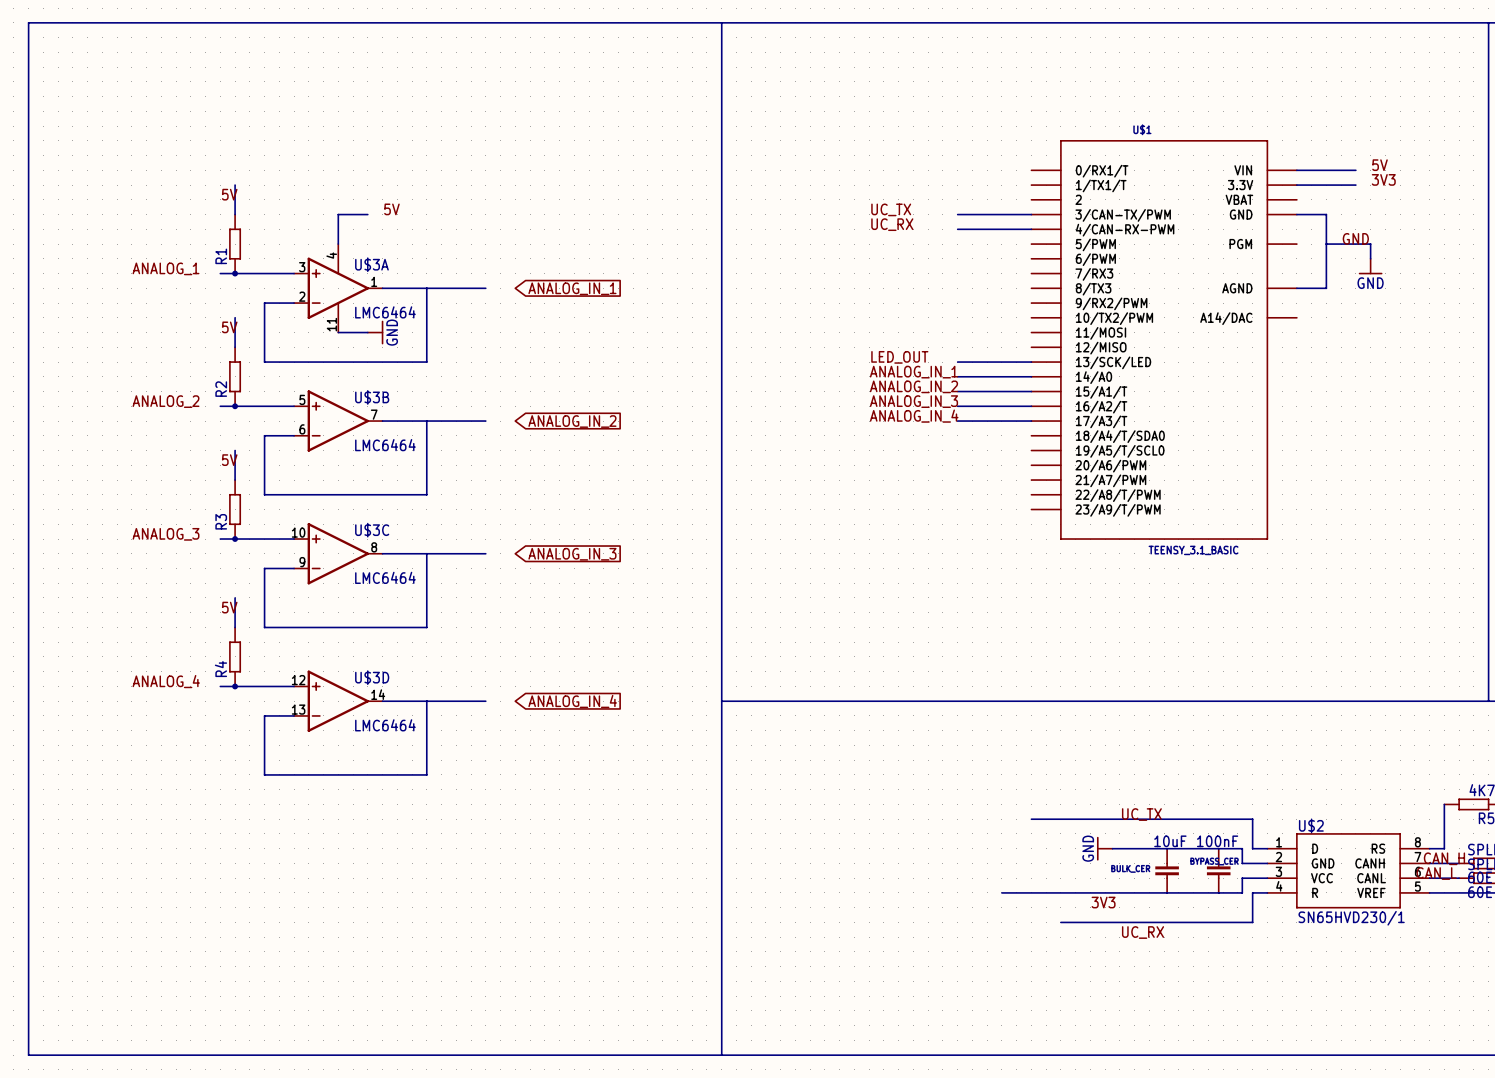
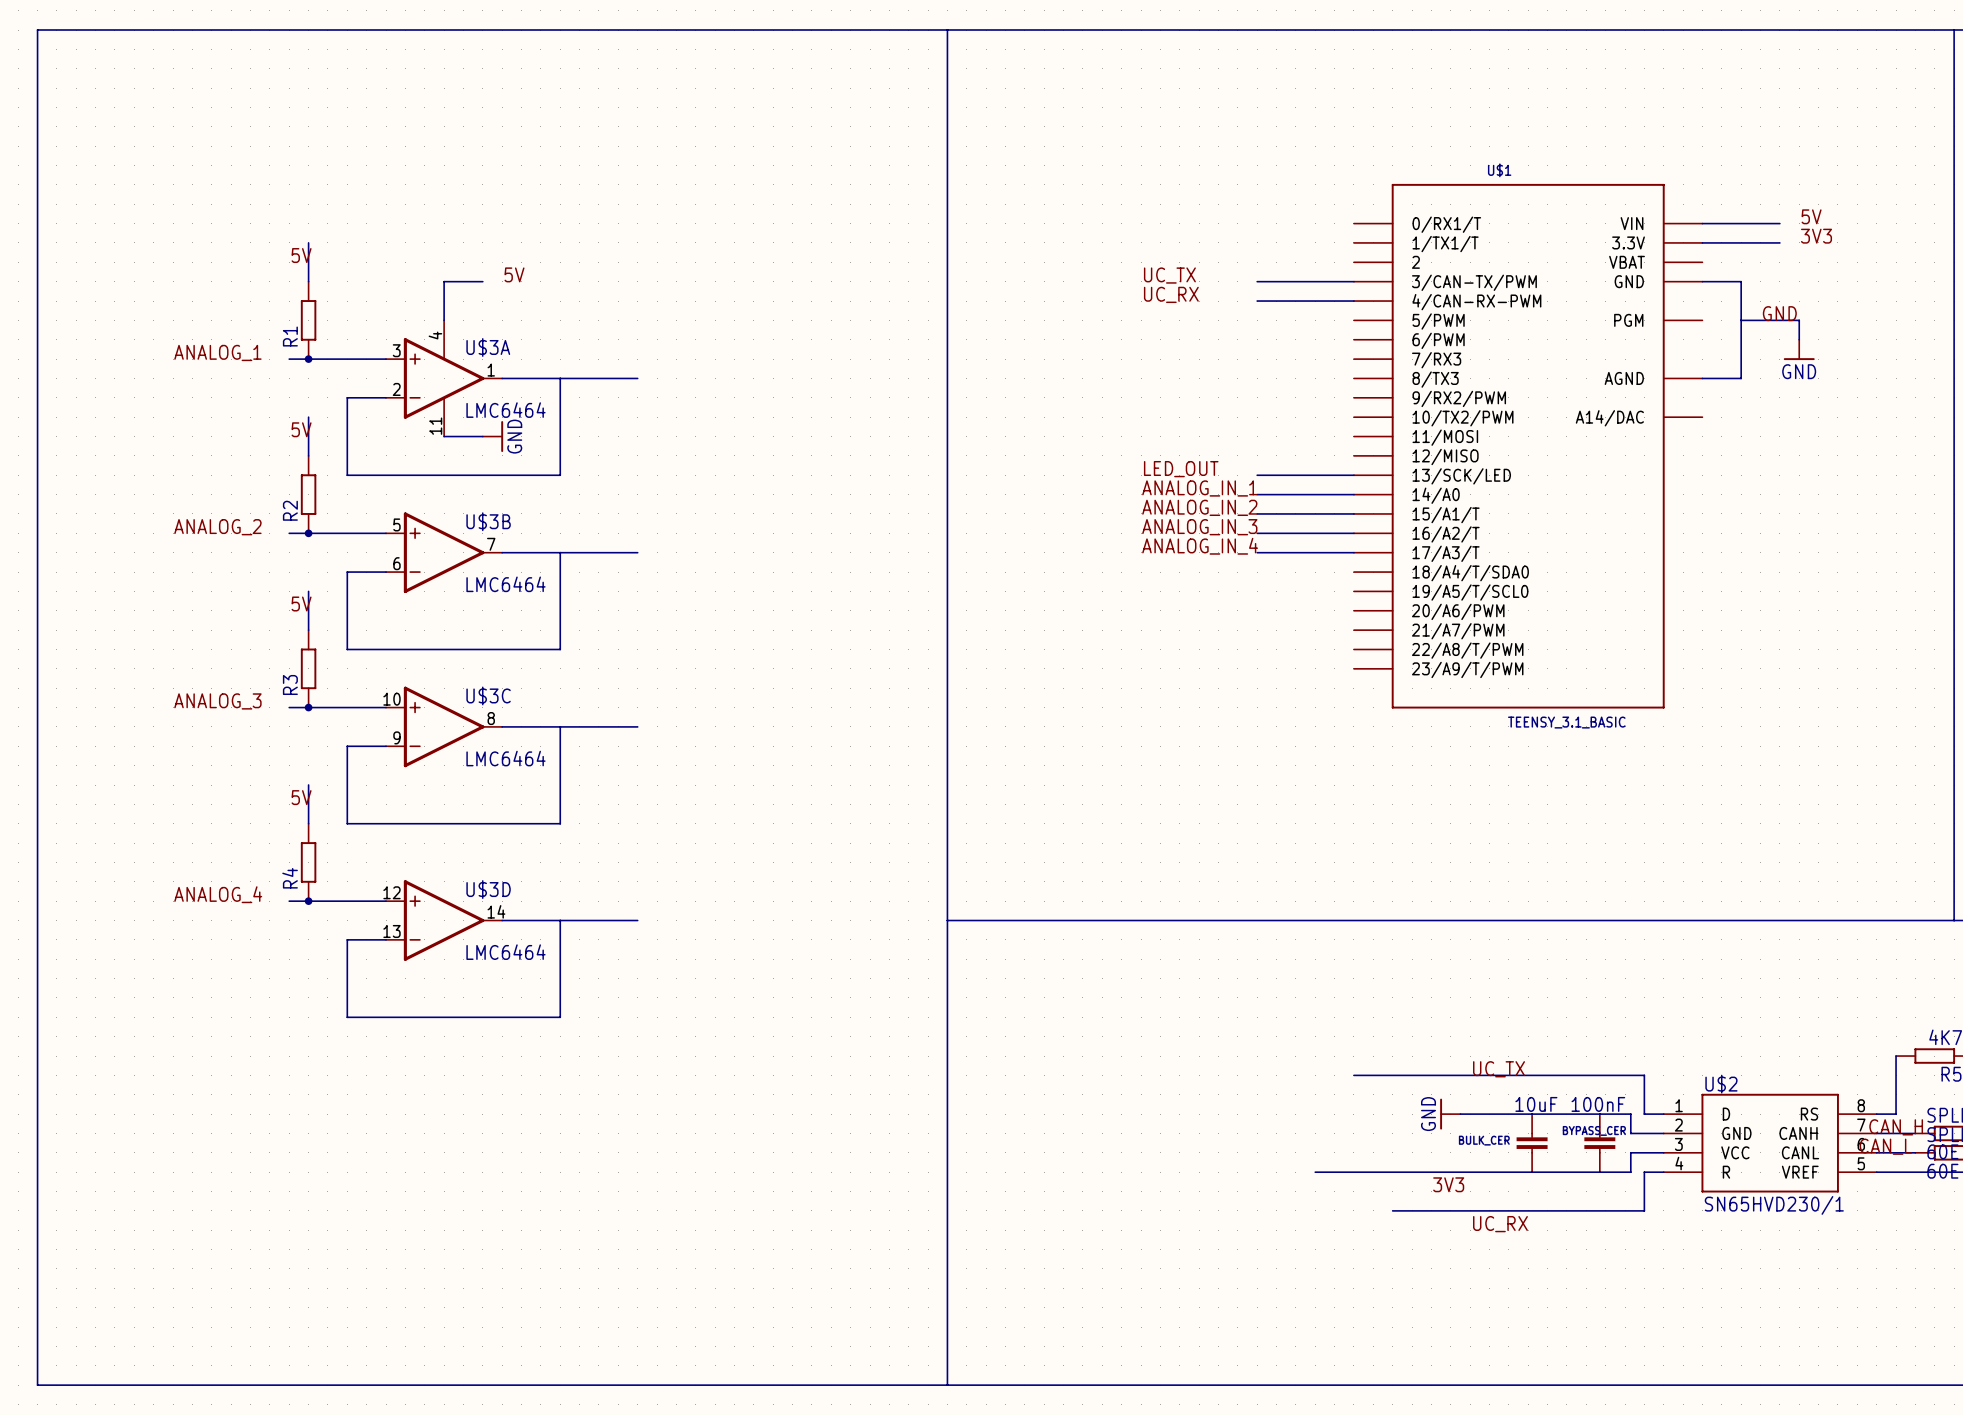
global label: ANALOG_IN_1 (572, 288) -> none
global label: ANALOG_IN_2 (572, 421) -> none
global label: ANALOG_IN_3 (572, 554) -> none
global label: ANALOG_IN_4 (572, 701) -> none

